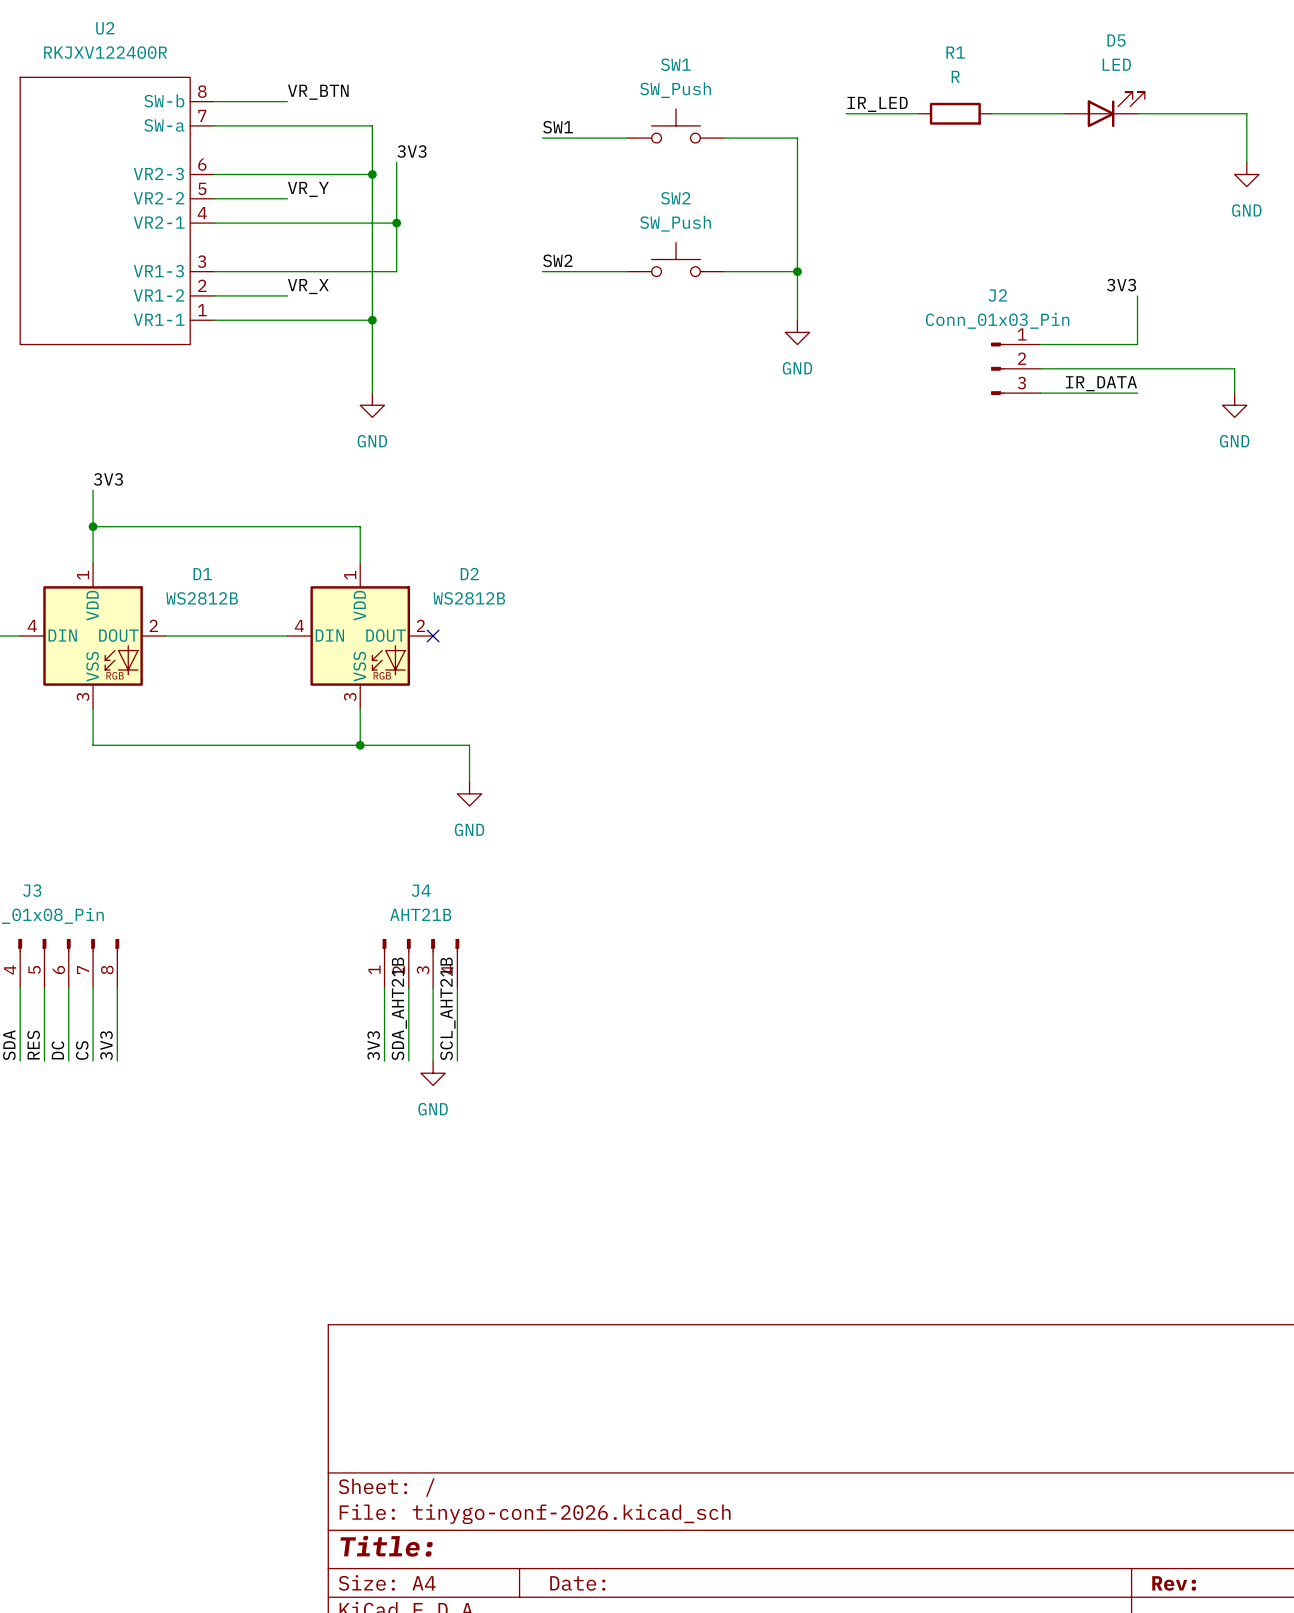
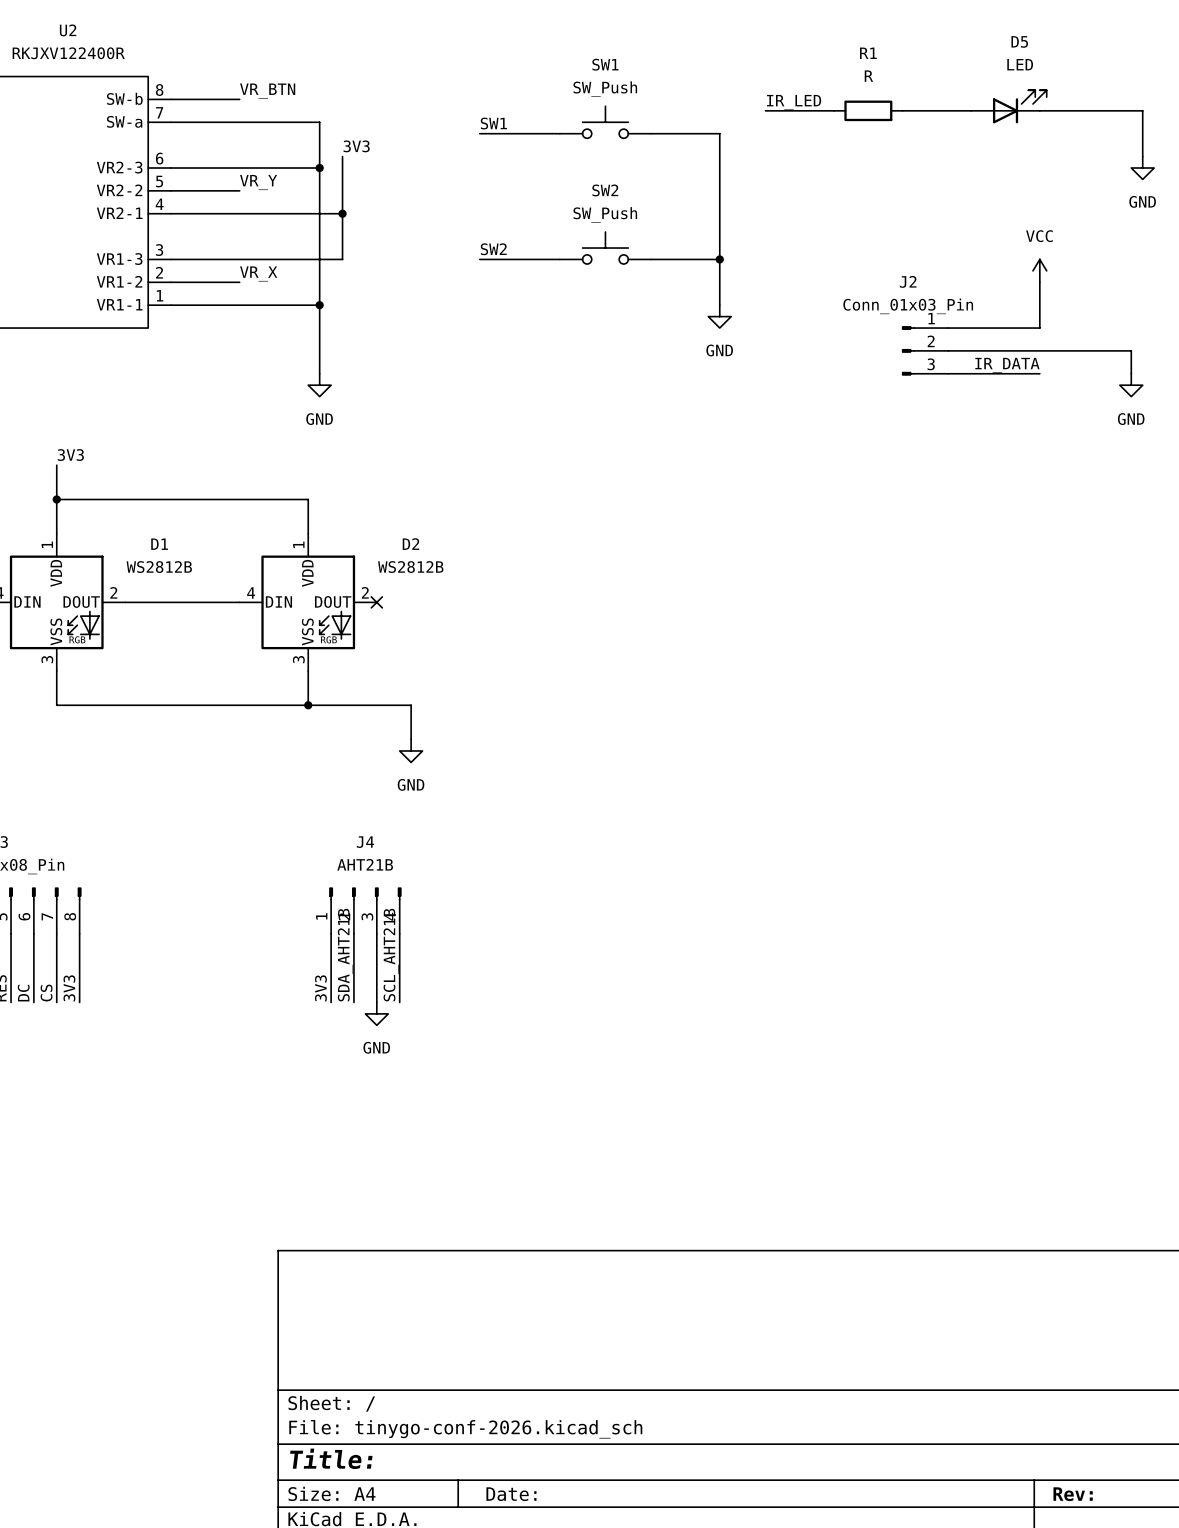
power symbol: none -> VCC (1039, 270)
label: 3V3 (1121, 285) -> none

